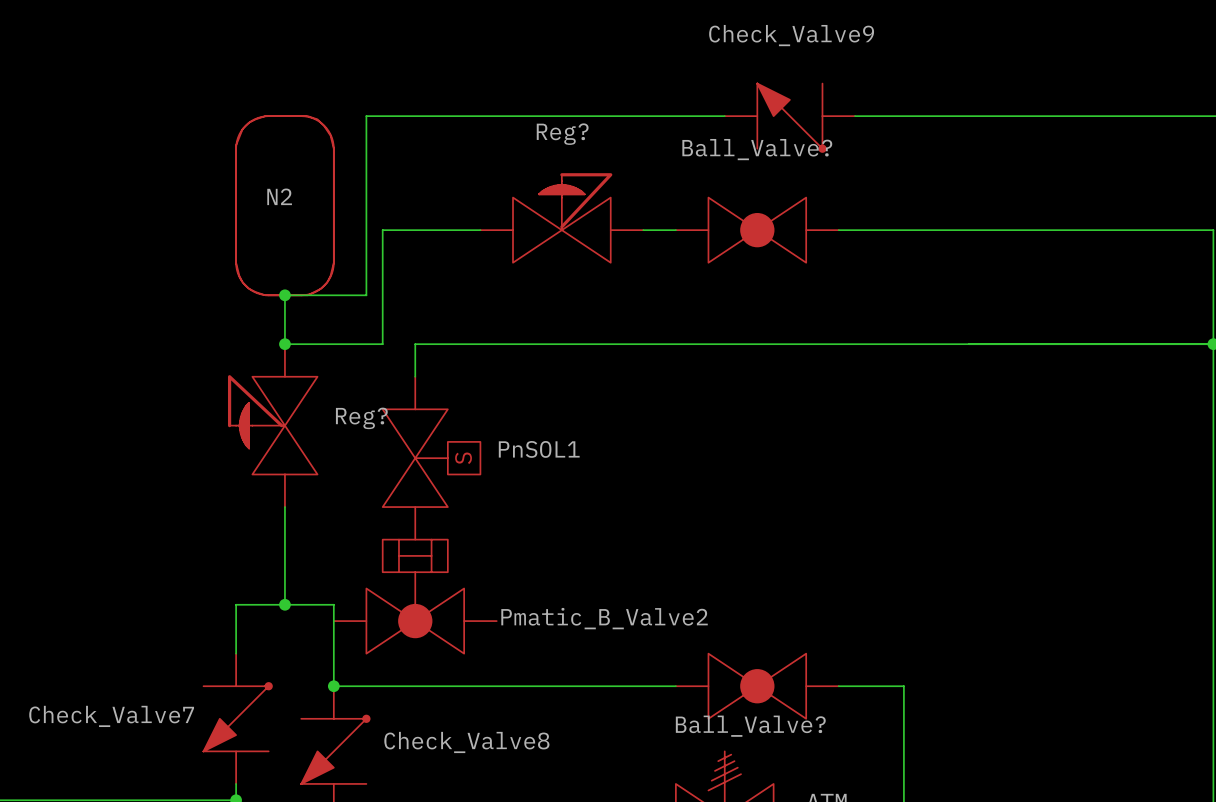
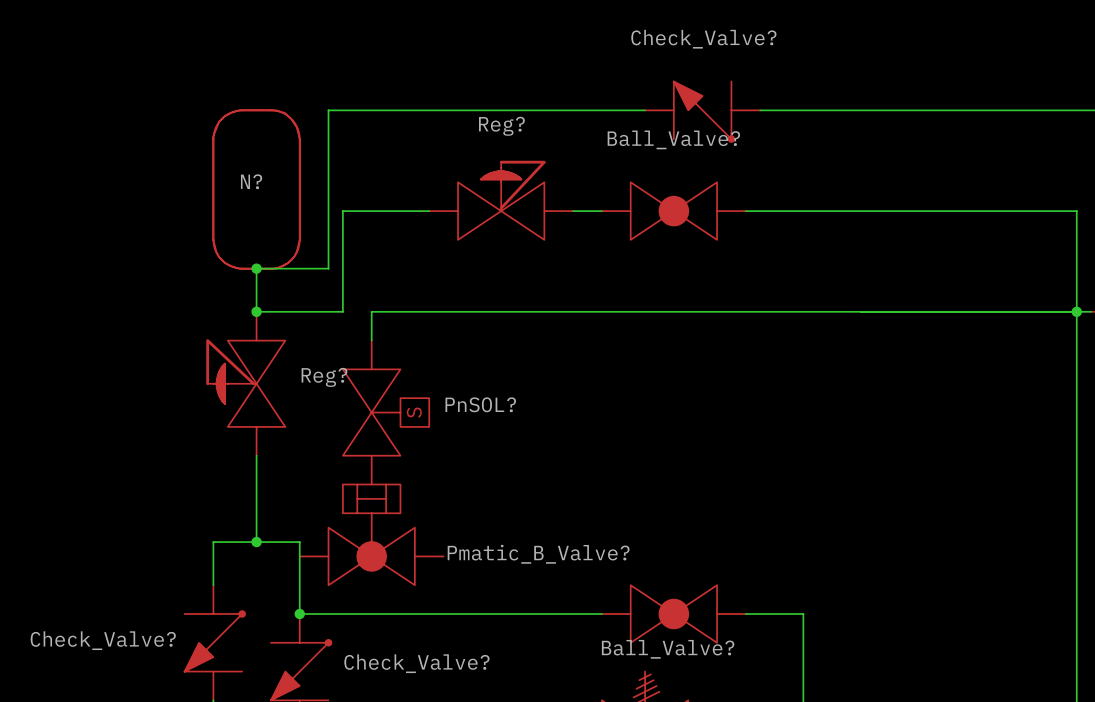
Check_Valve9 name: Check_Valve9 (791, 35) -> Check_Valve? (703, 39)
N2 name: N2 (279, 196) -> N? (251, 181)
PnSOL1 name: PnSOL1 (539, 449) -> PnSOL? (480, 404)
Pmatic_B_Valve2 name: Pmatic_B_Valve2 (604, 618) -> Pmatic_B_Valve? (538, 554)
Check_Valve7 name: Check_Valve7 (111, 716) -> Check_Valve? (103, 640)
Check_Valve8 name: Check_Valve8 (466, 742) -> Check_Valve? (416, 663)

